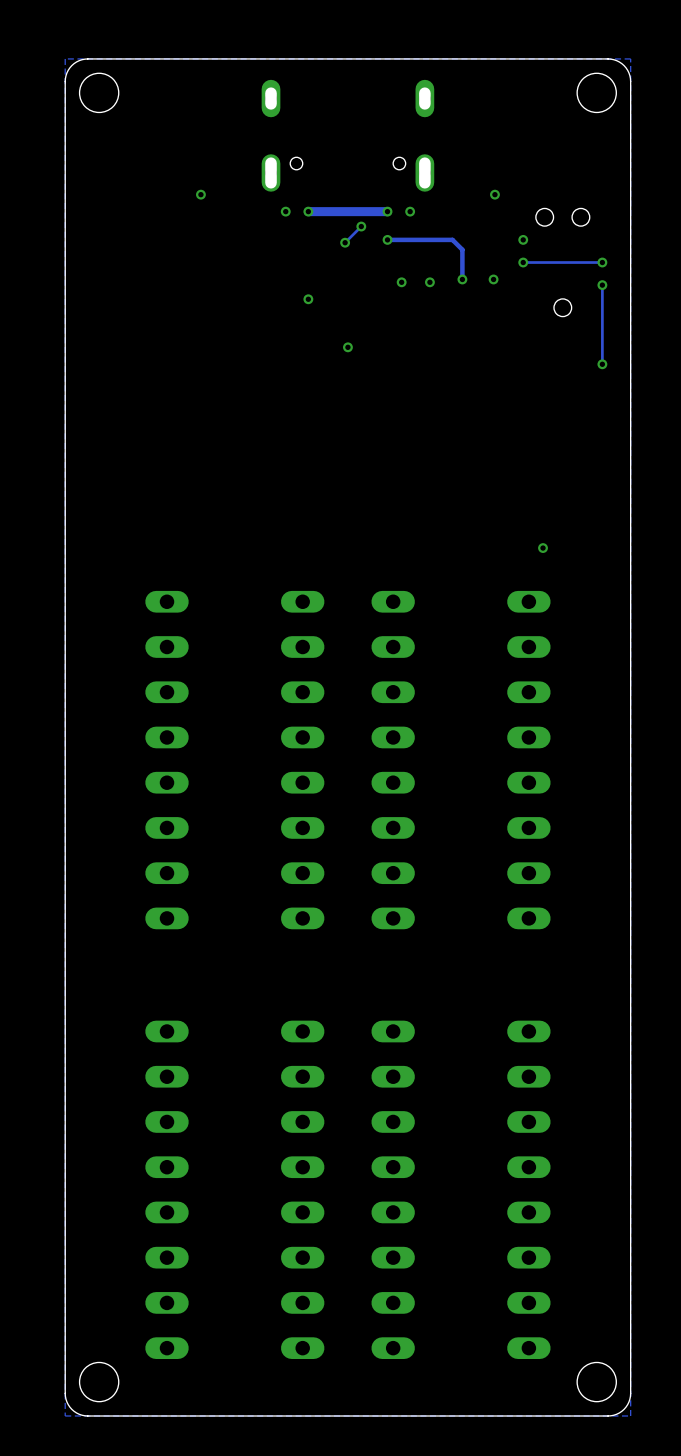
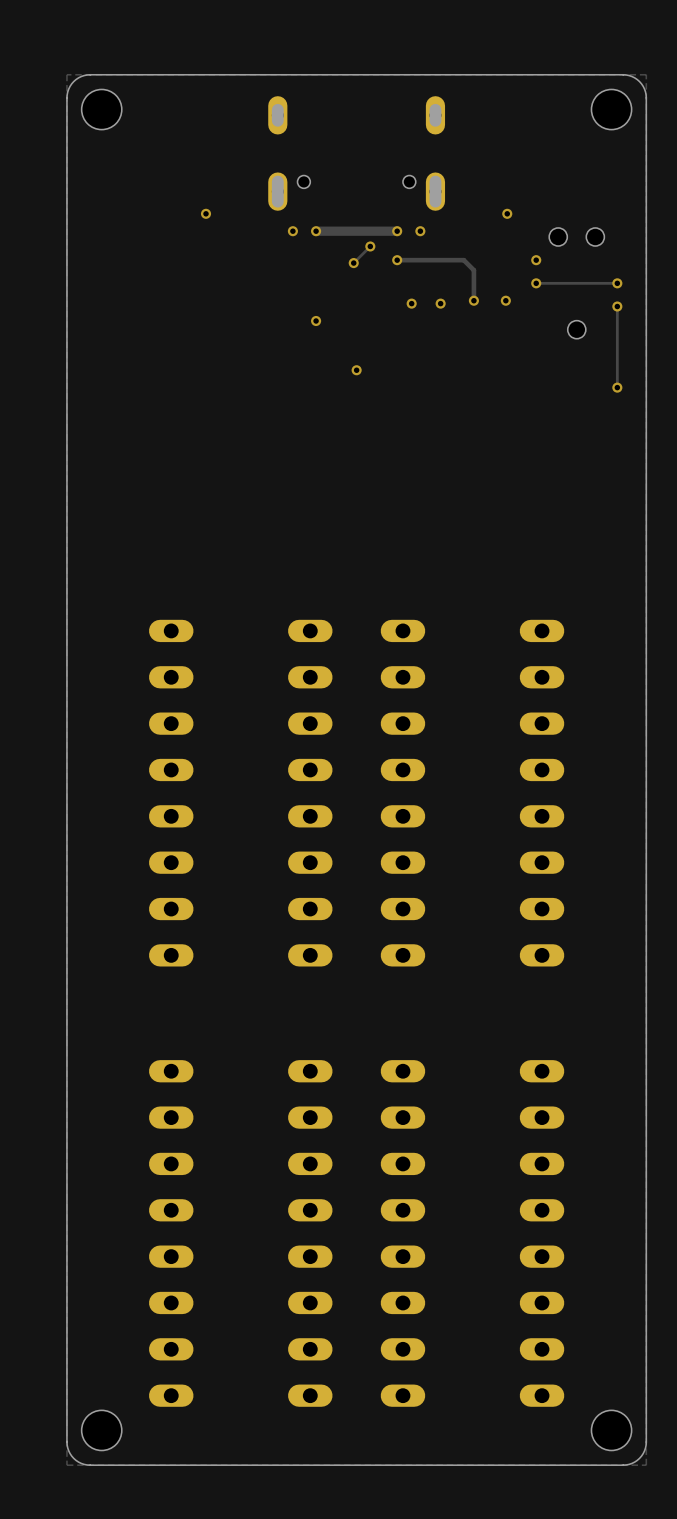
via: (543, 548) -> none

